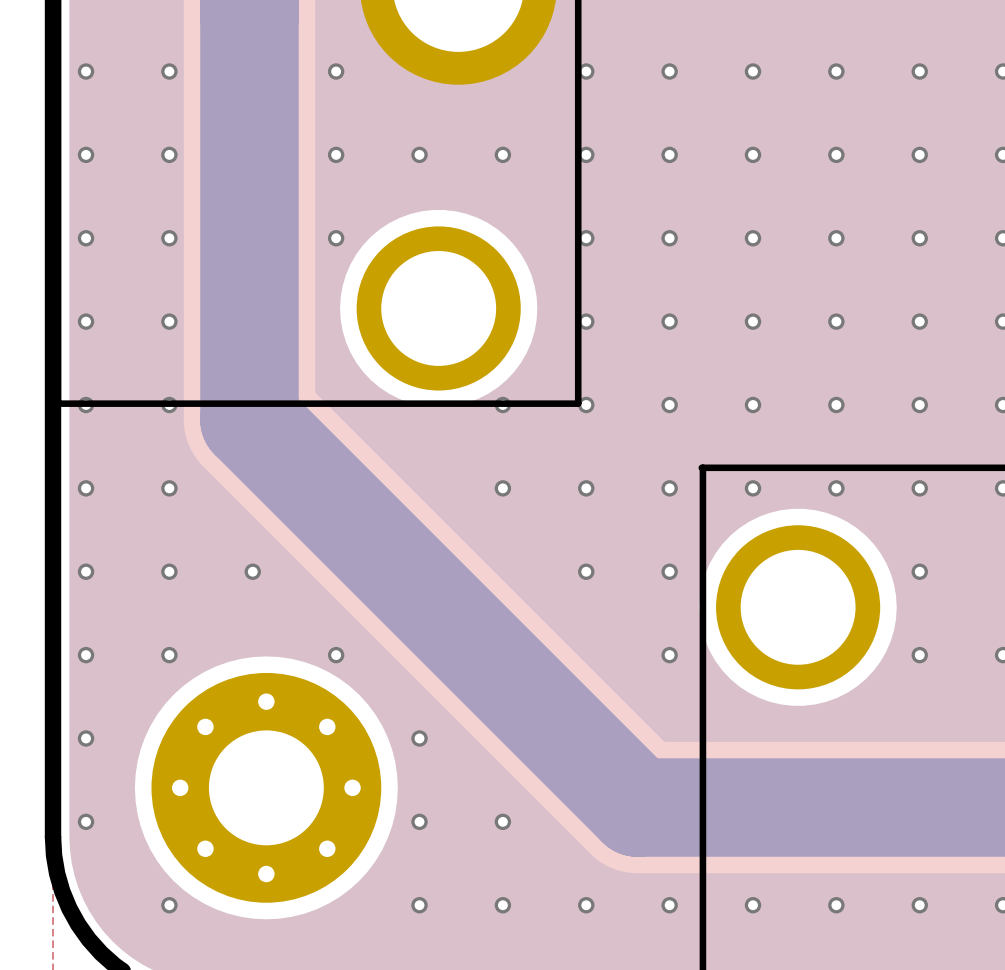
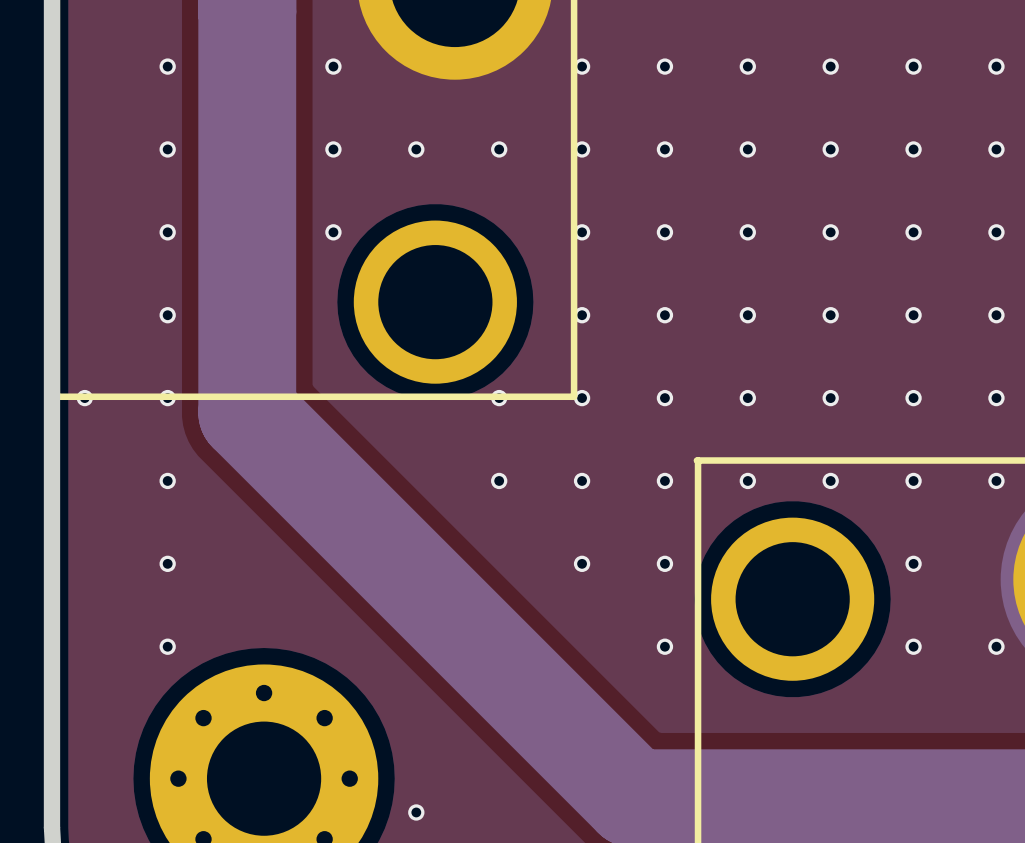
via: (86, 71) -> none
via: (86, 154) -> none
via: (86, 238) -> none
via: (86, 321) -> none
via: (86, 488) -> none
via: (86, 571) -> none
via: (252, 571) -> none
via: (86, 655) -> none
via: (336, 655) -> none
via: (86, 738) -> none
via: (419, 738) -> none
via: (86, 821) -> none
via: (502, 821) -> none

